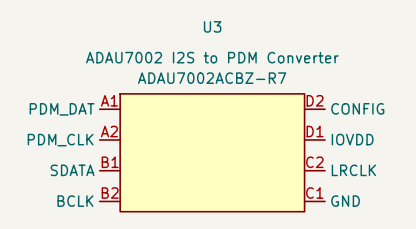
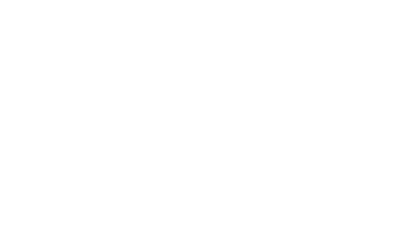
U3: (212, 152) -> none

